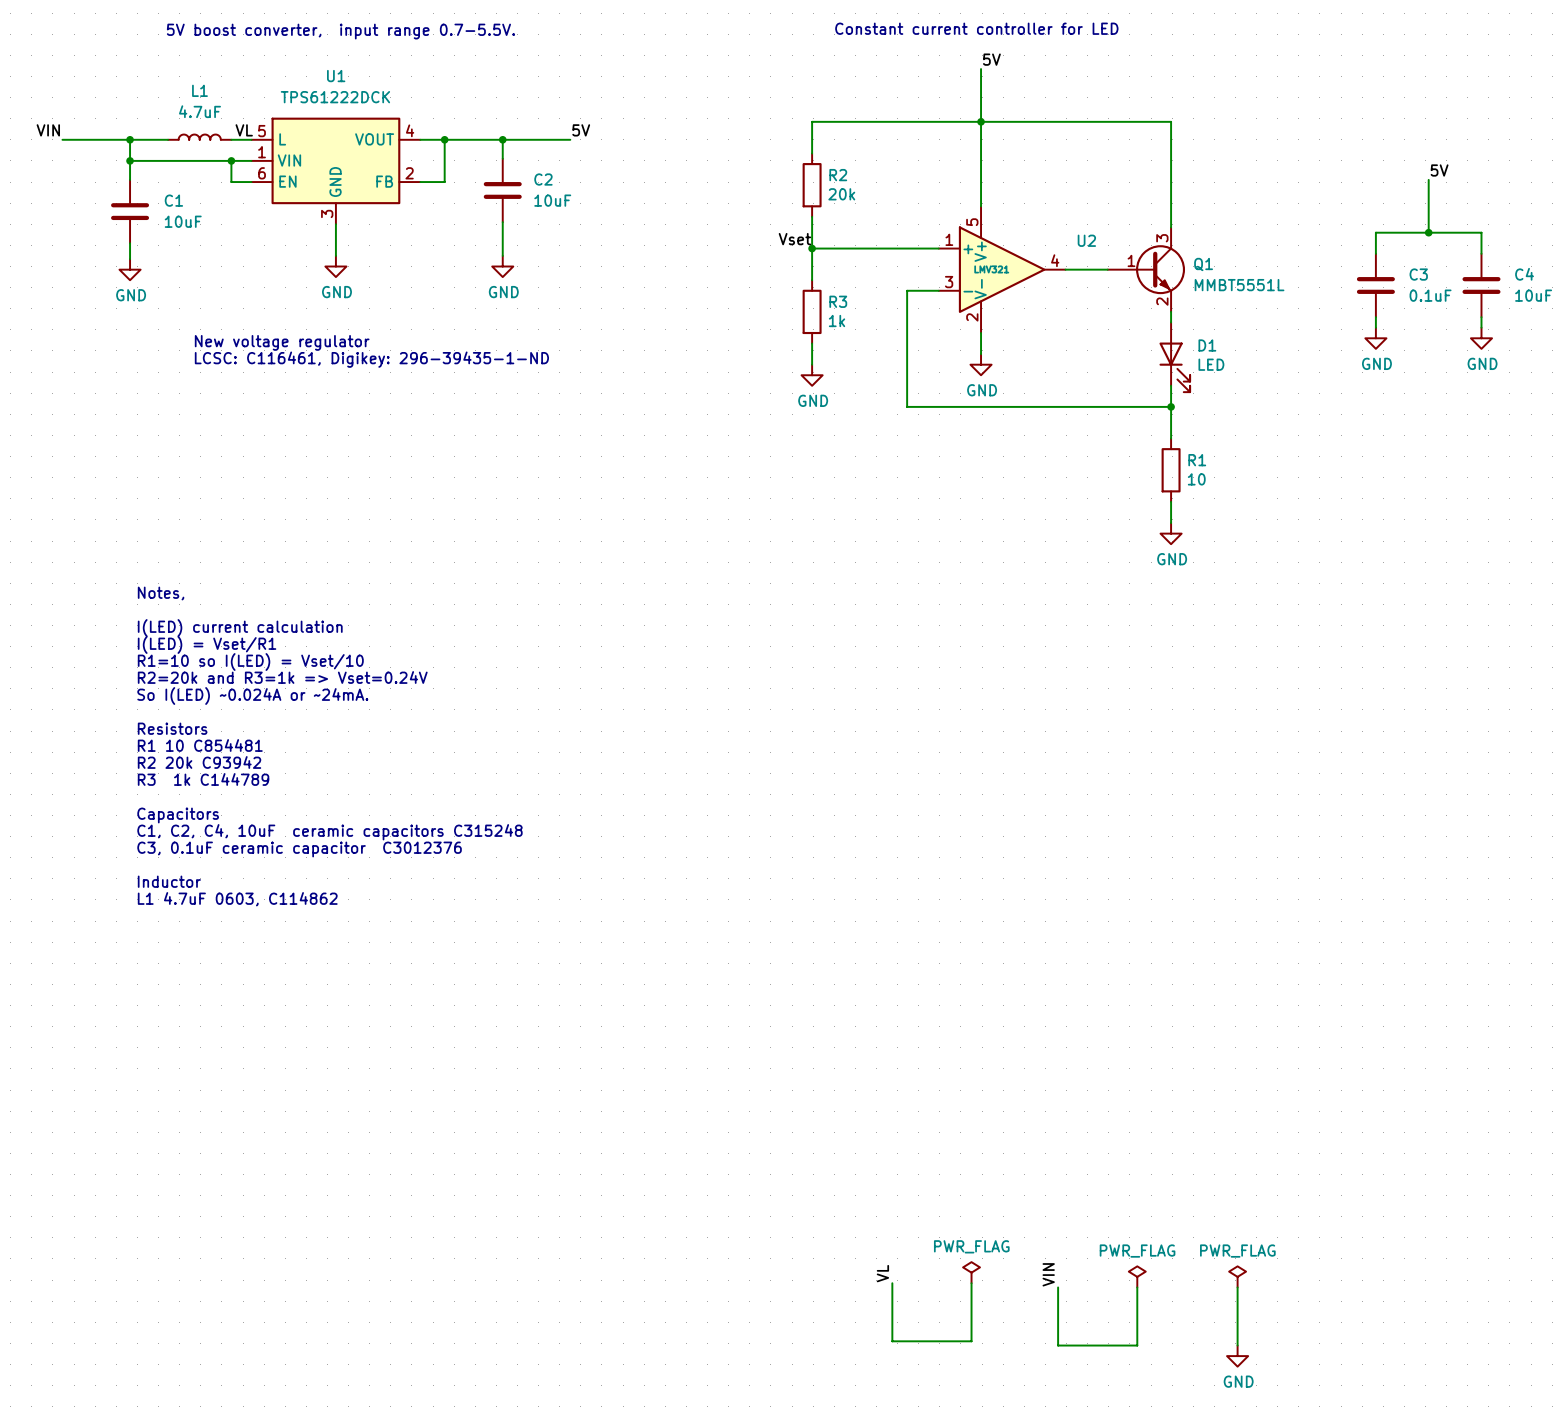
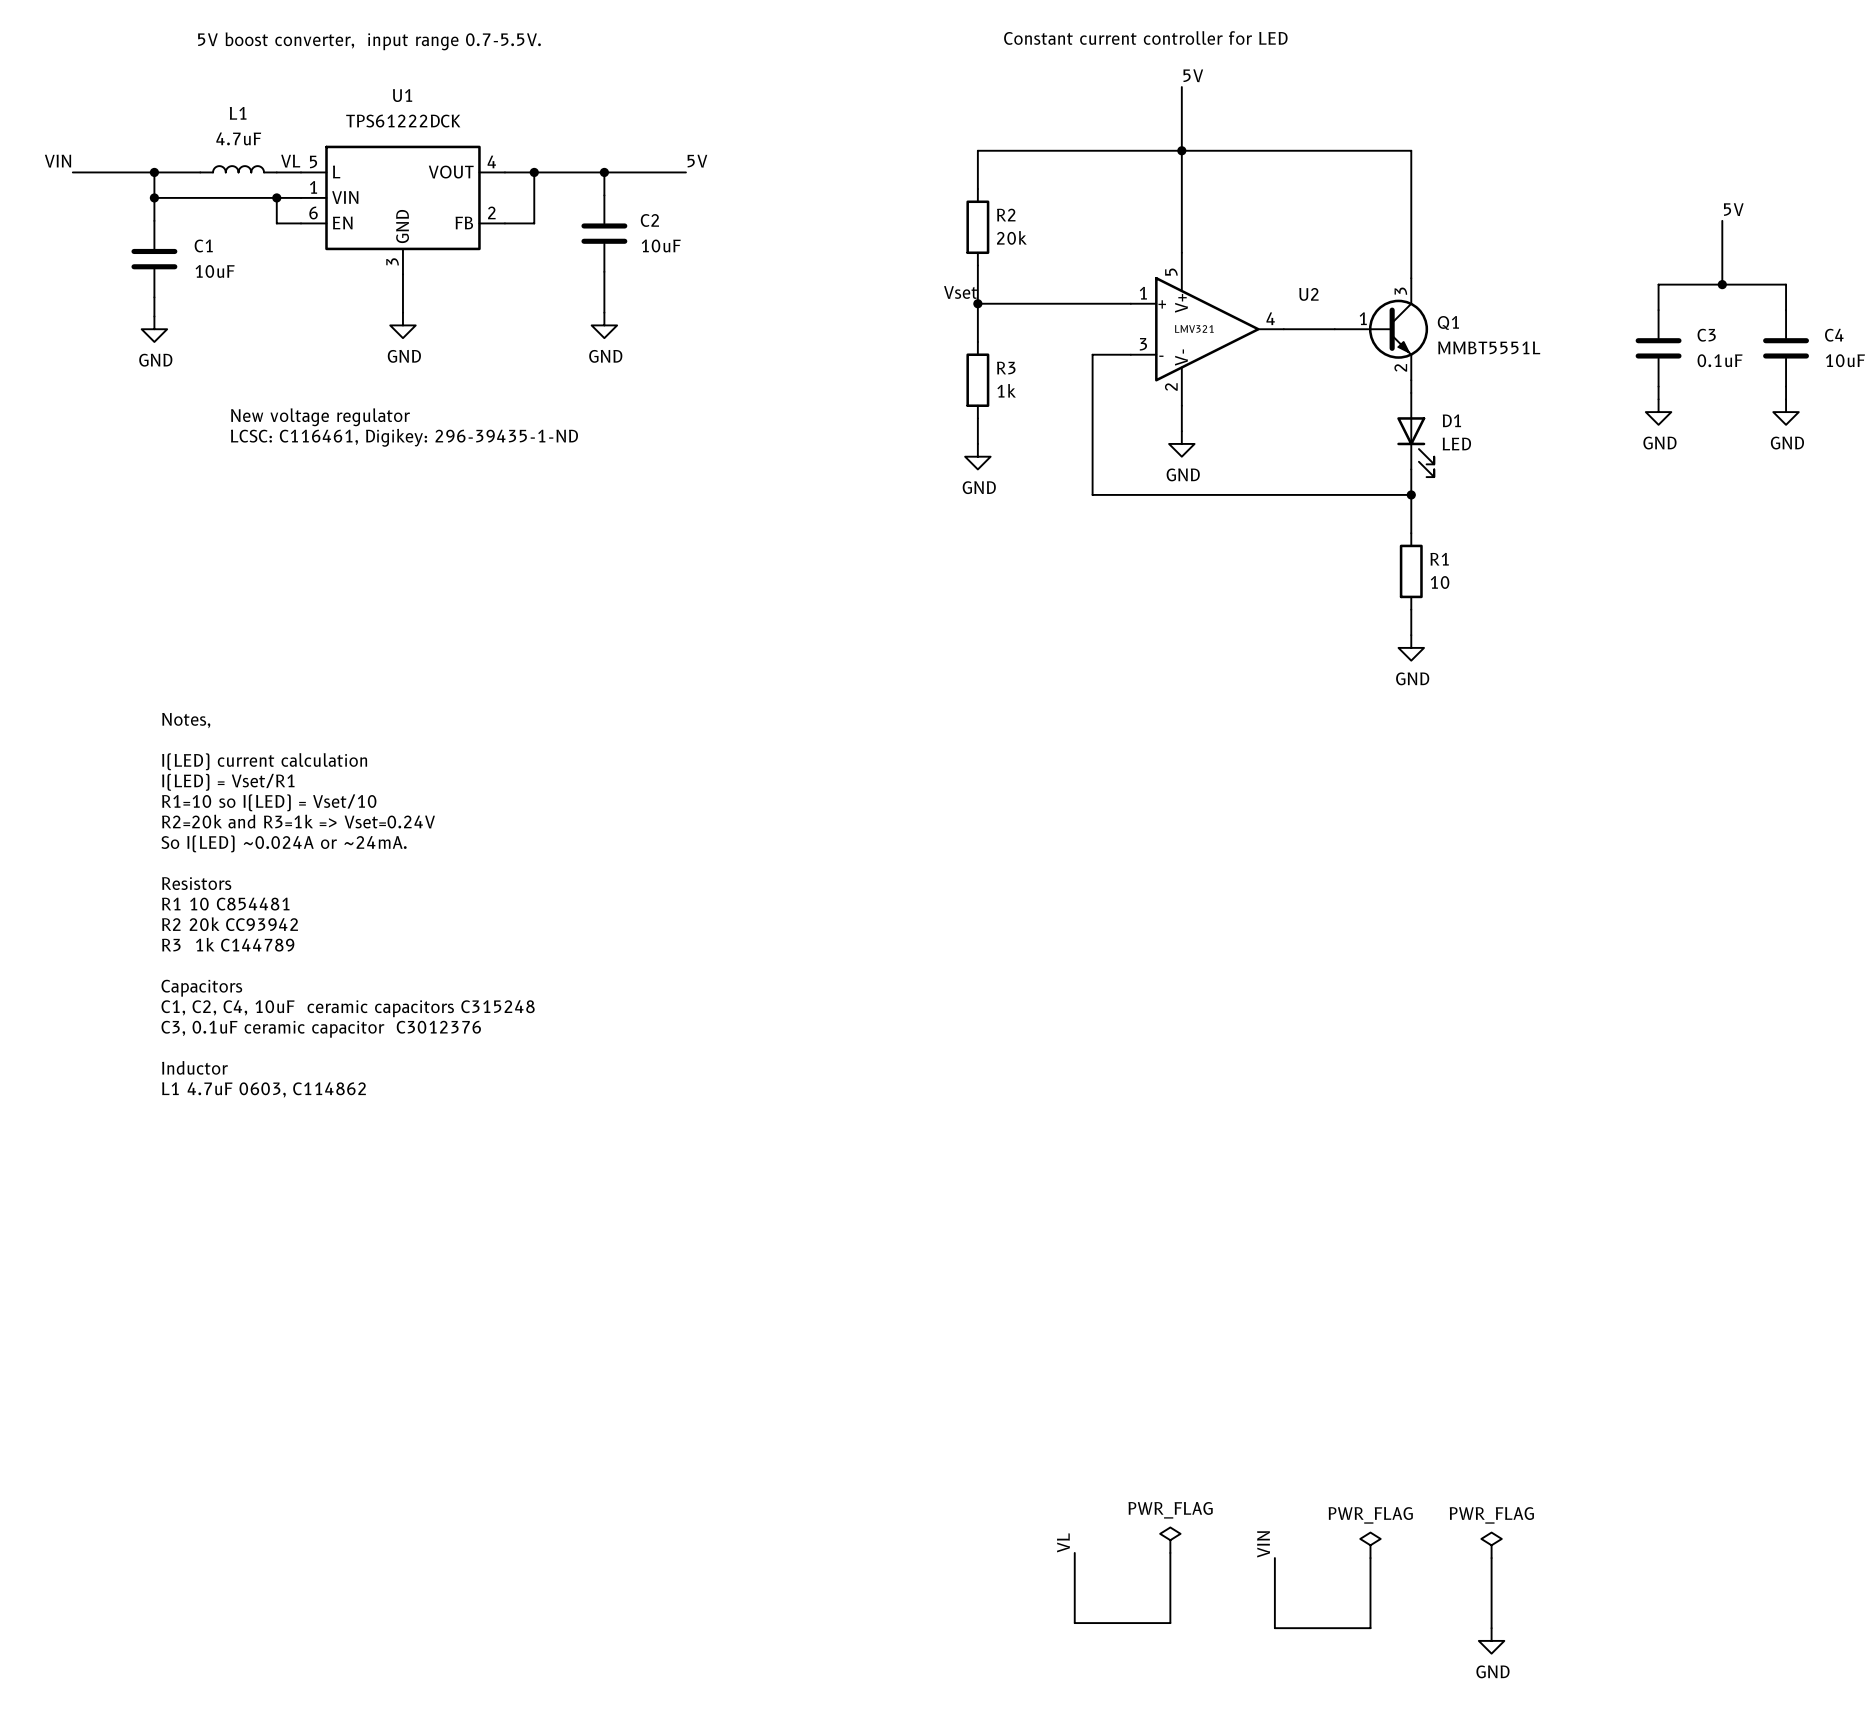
text: R2 20k C93942 (199, 762) -> R2 20k CC93942 (230, 924)

